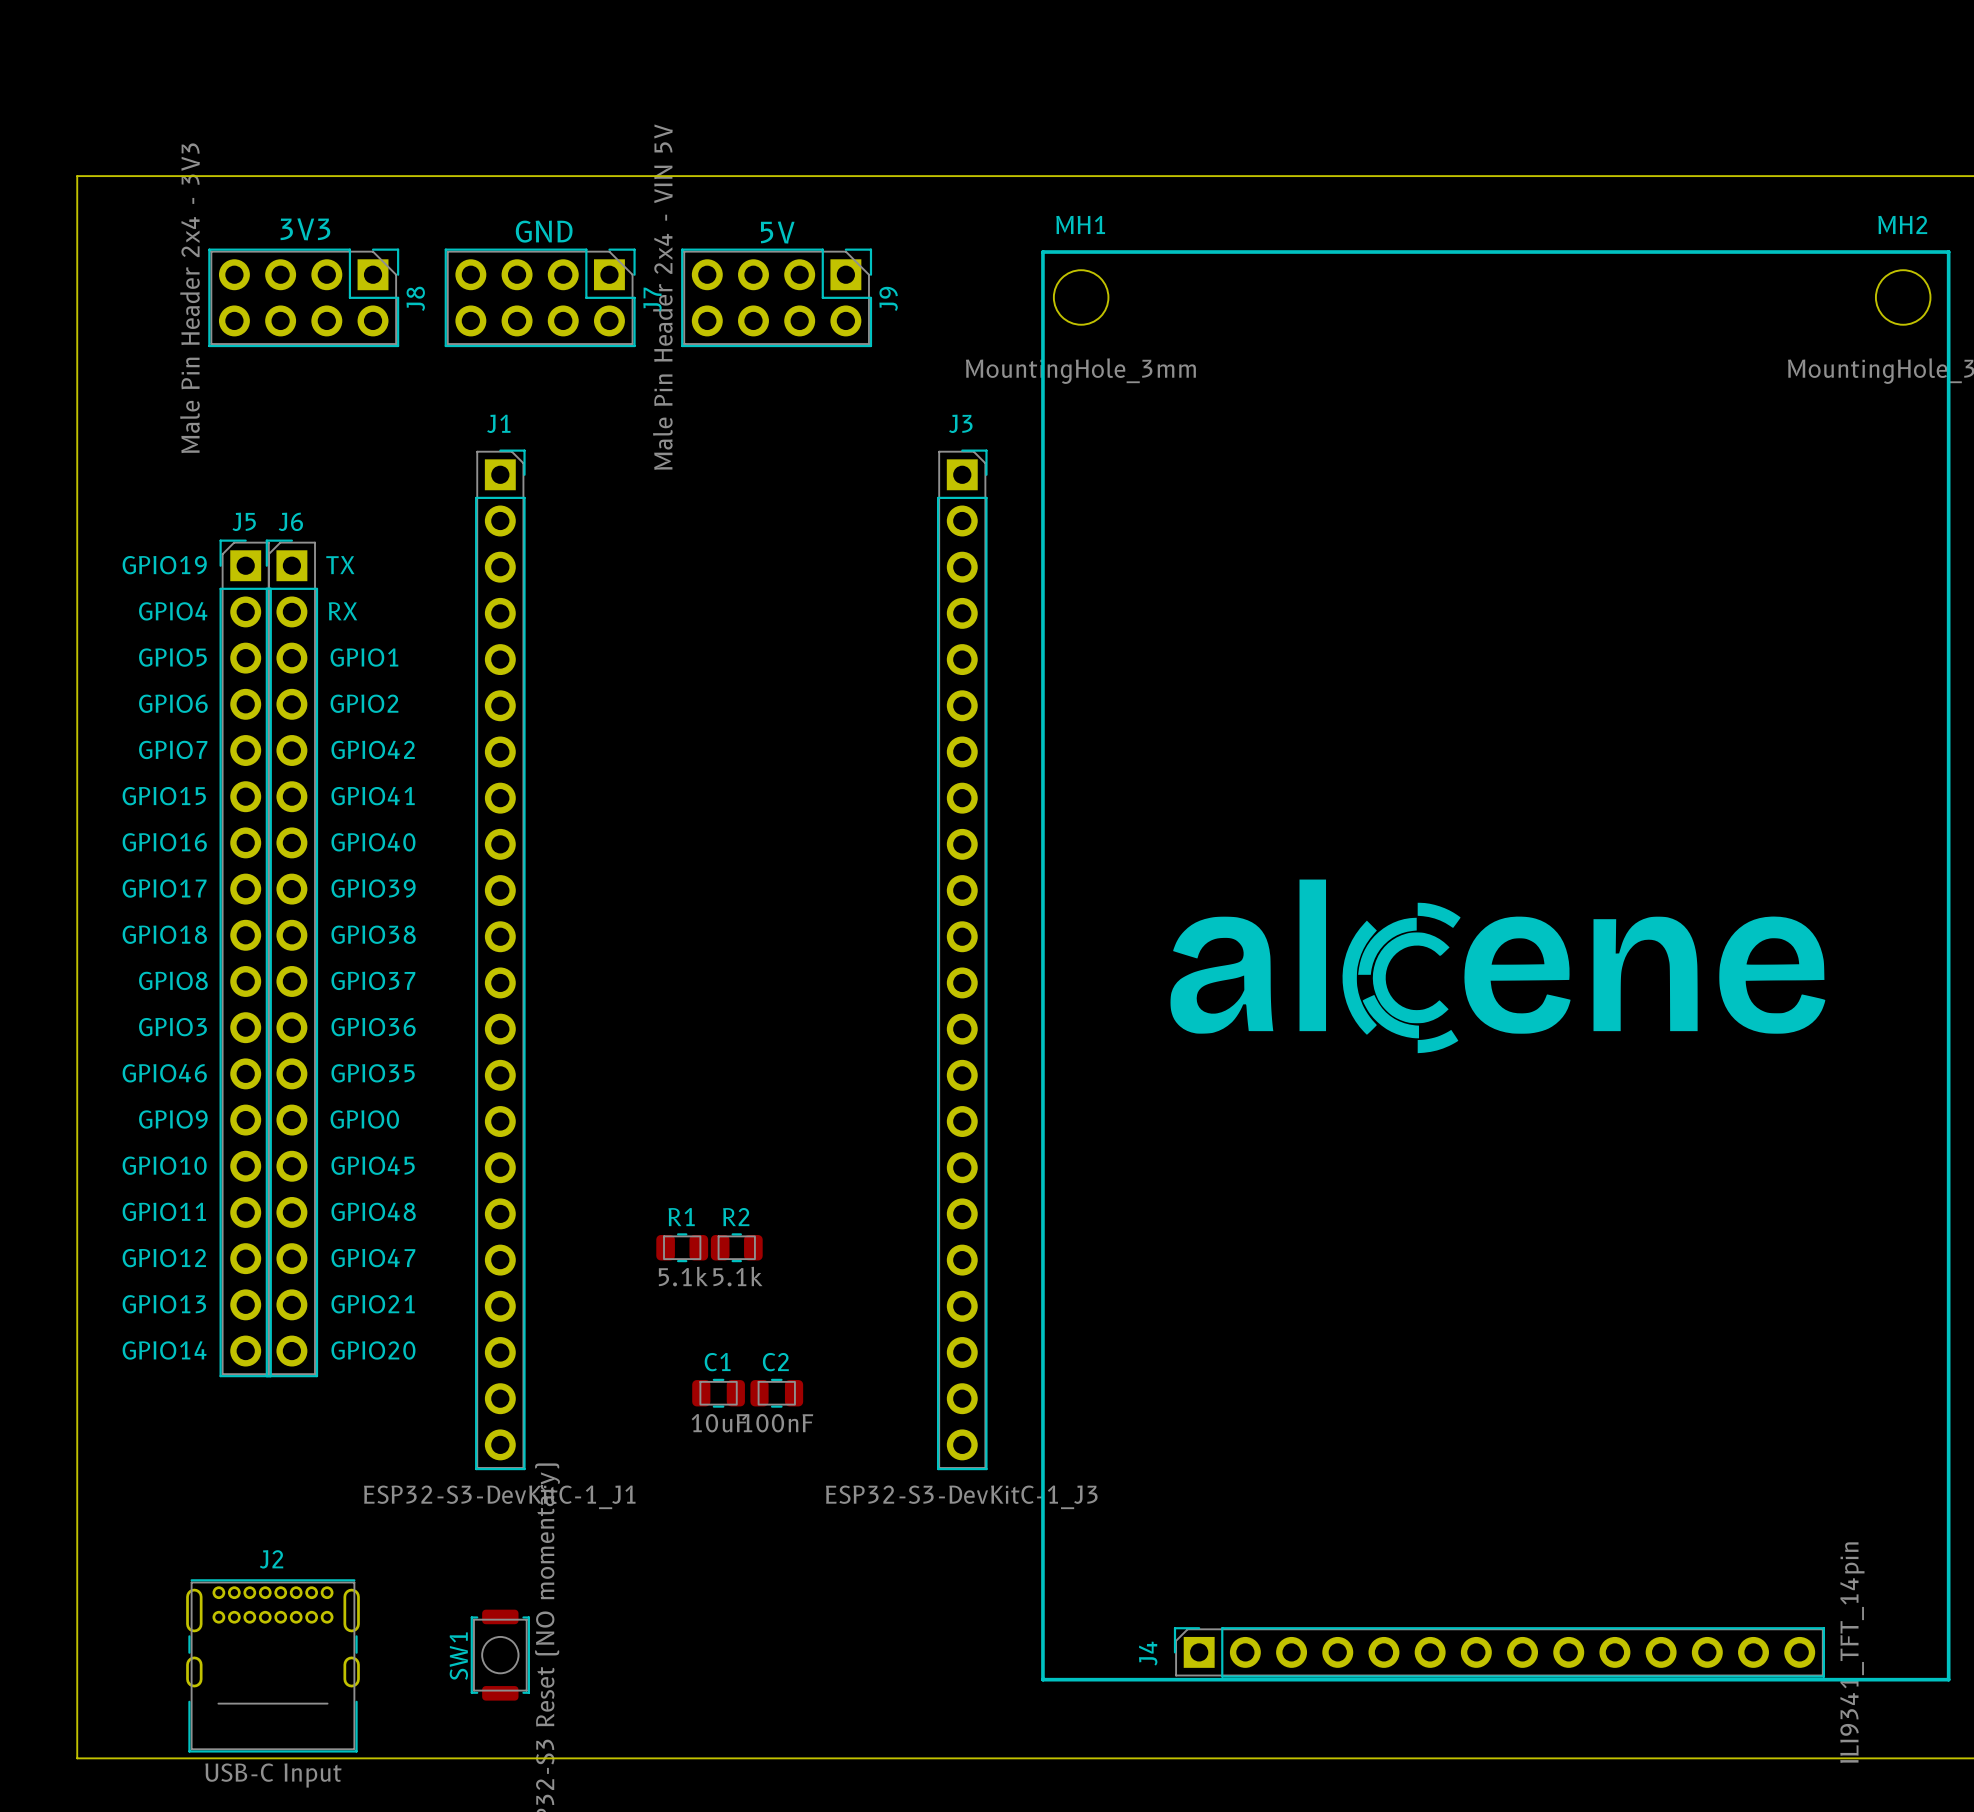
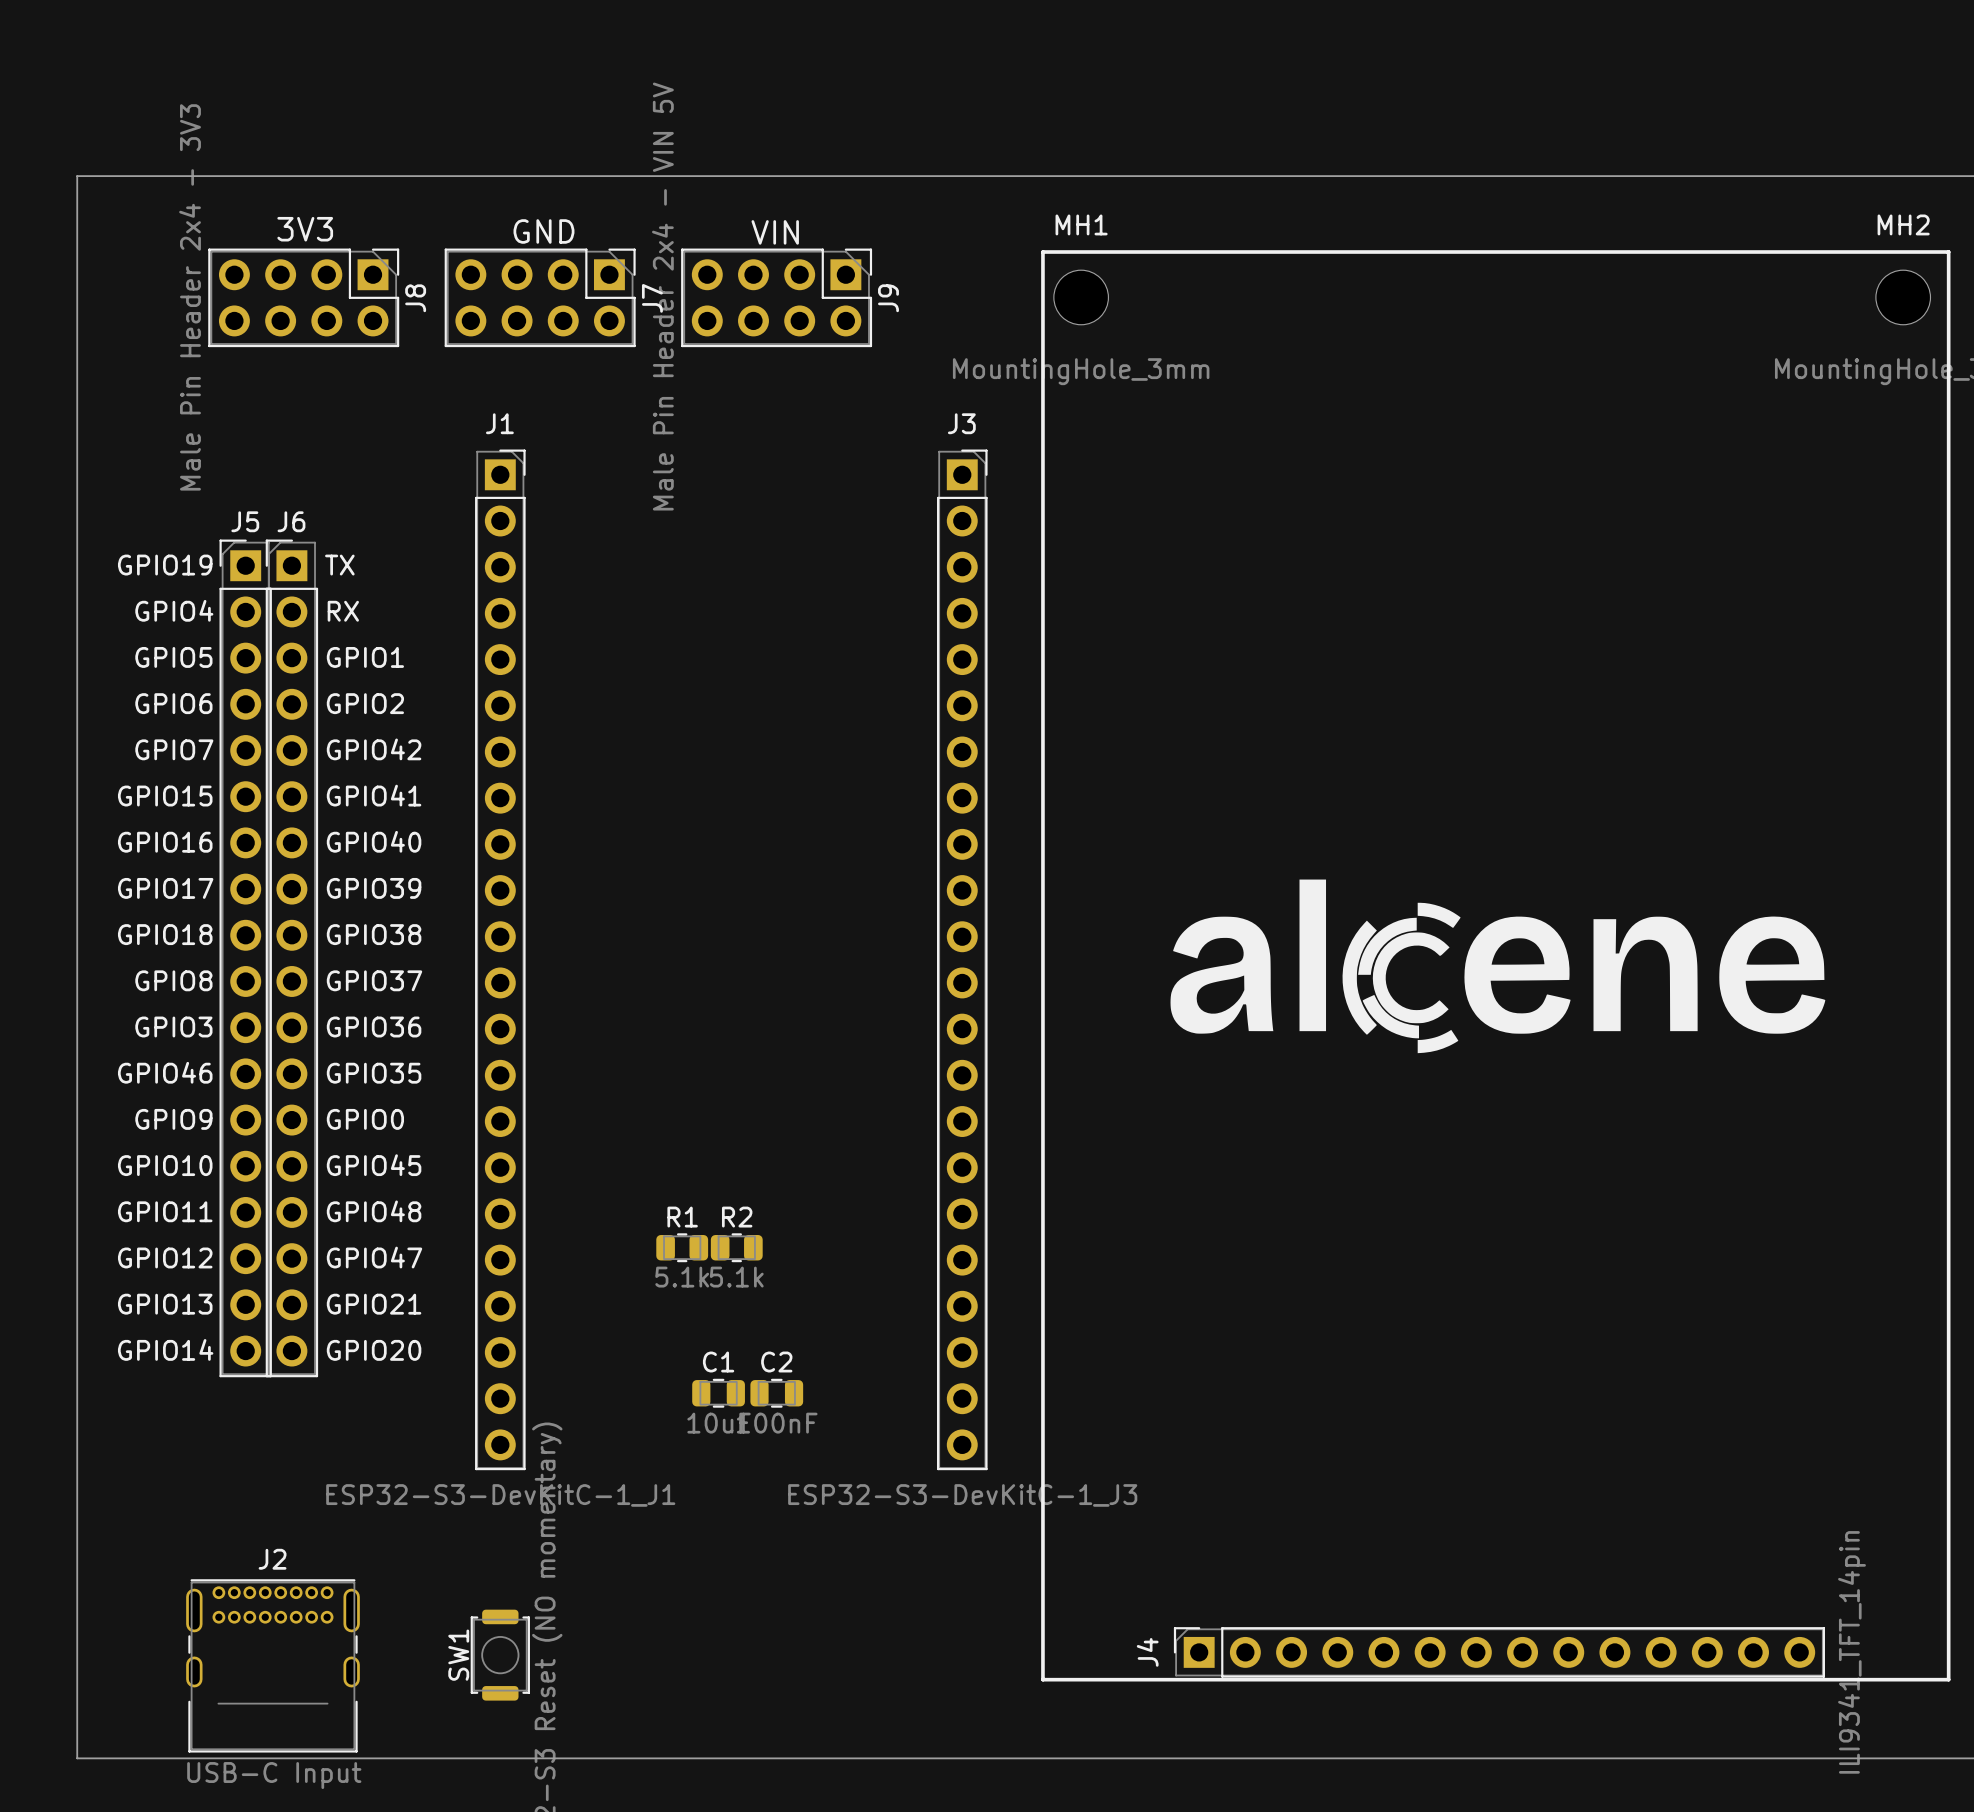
text: 5V (777, 232) -> VIN (775, 232)

